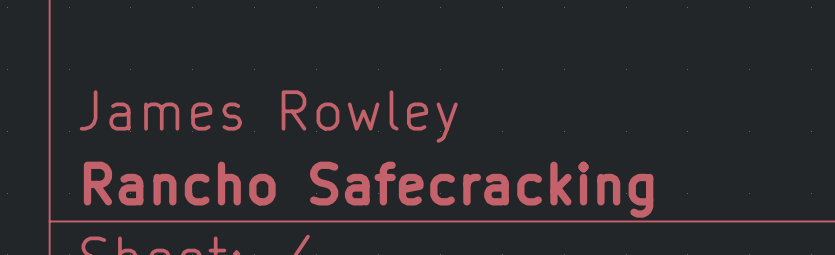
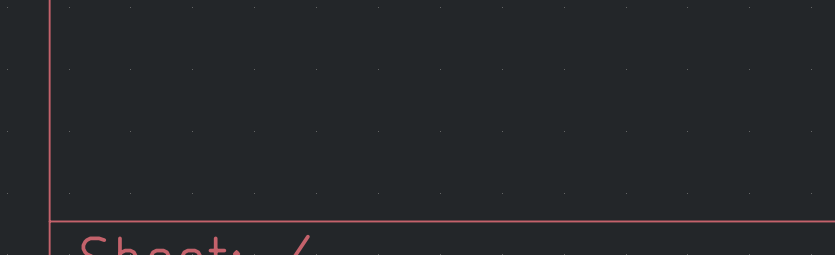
title block: James Rowley (268, 116) -> none
title block: Rancho Safecracking (368, 189) -> none

